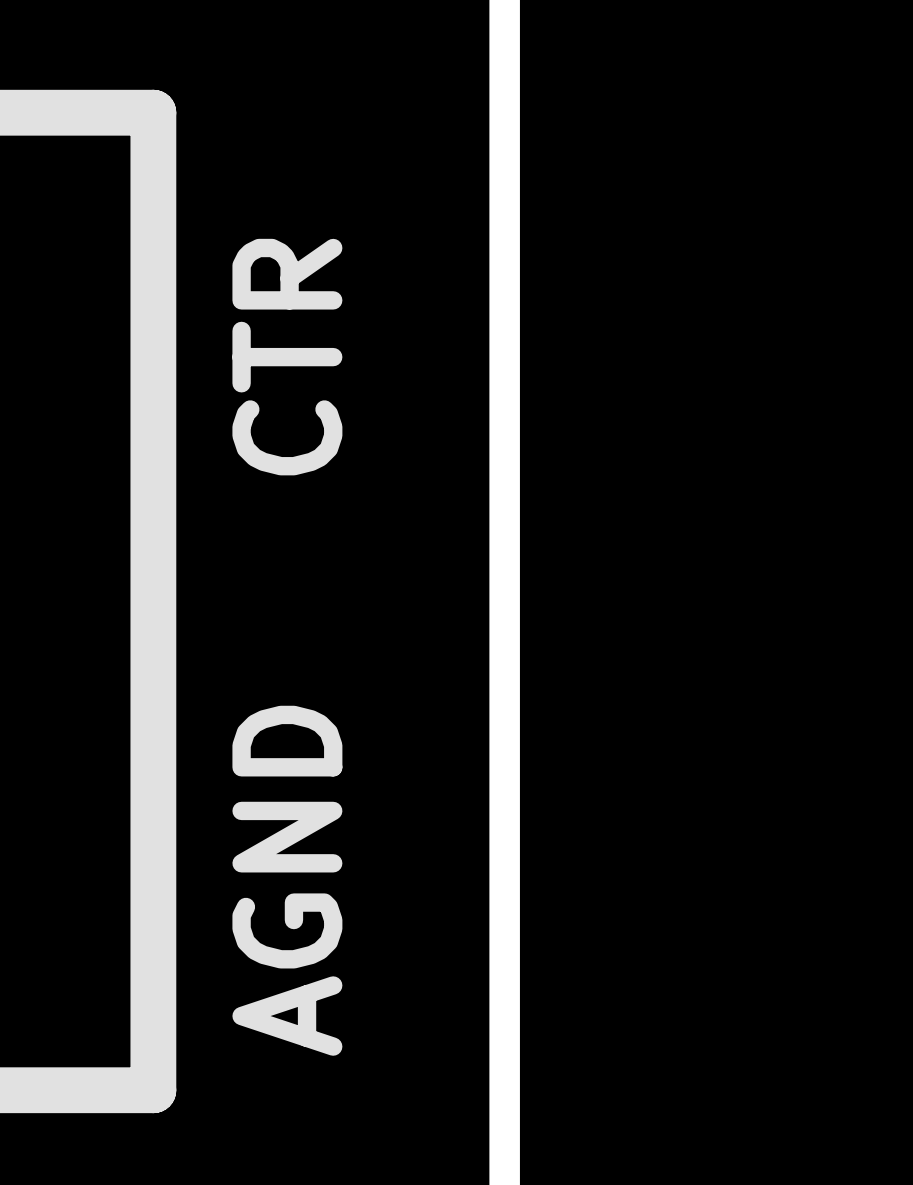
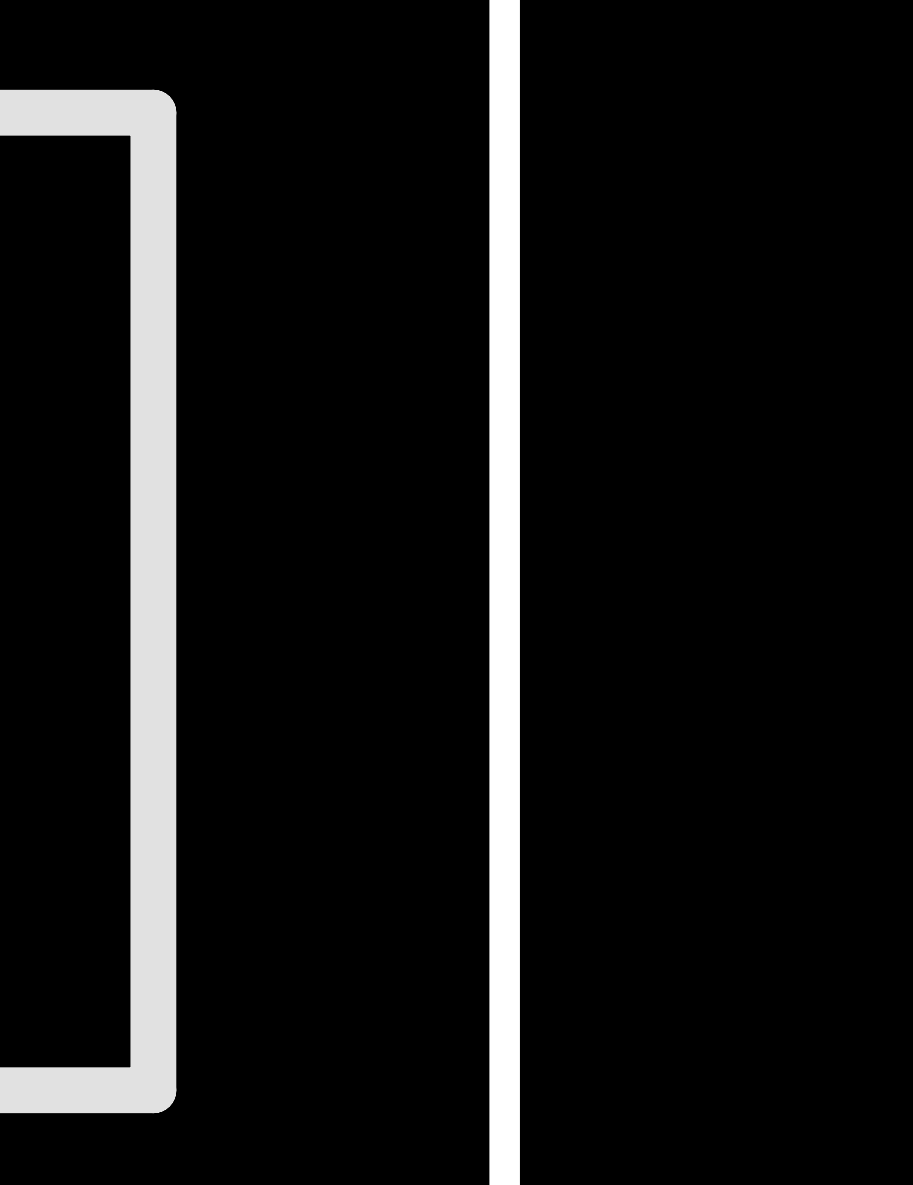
text: CTR (287, 357) -> none
text: AGND (287, 880) -> none

